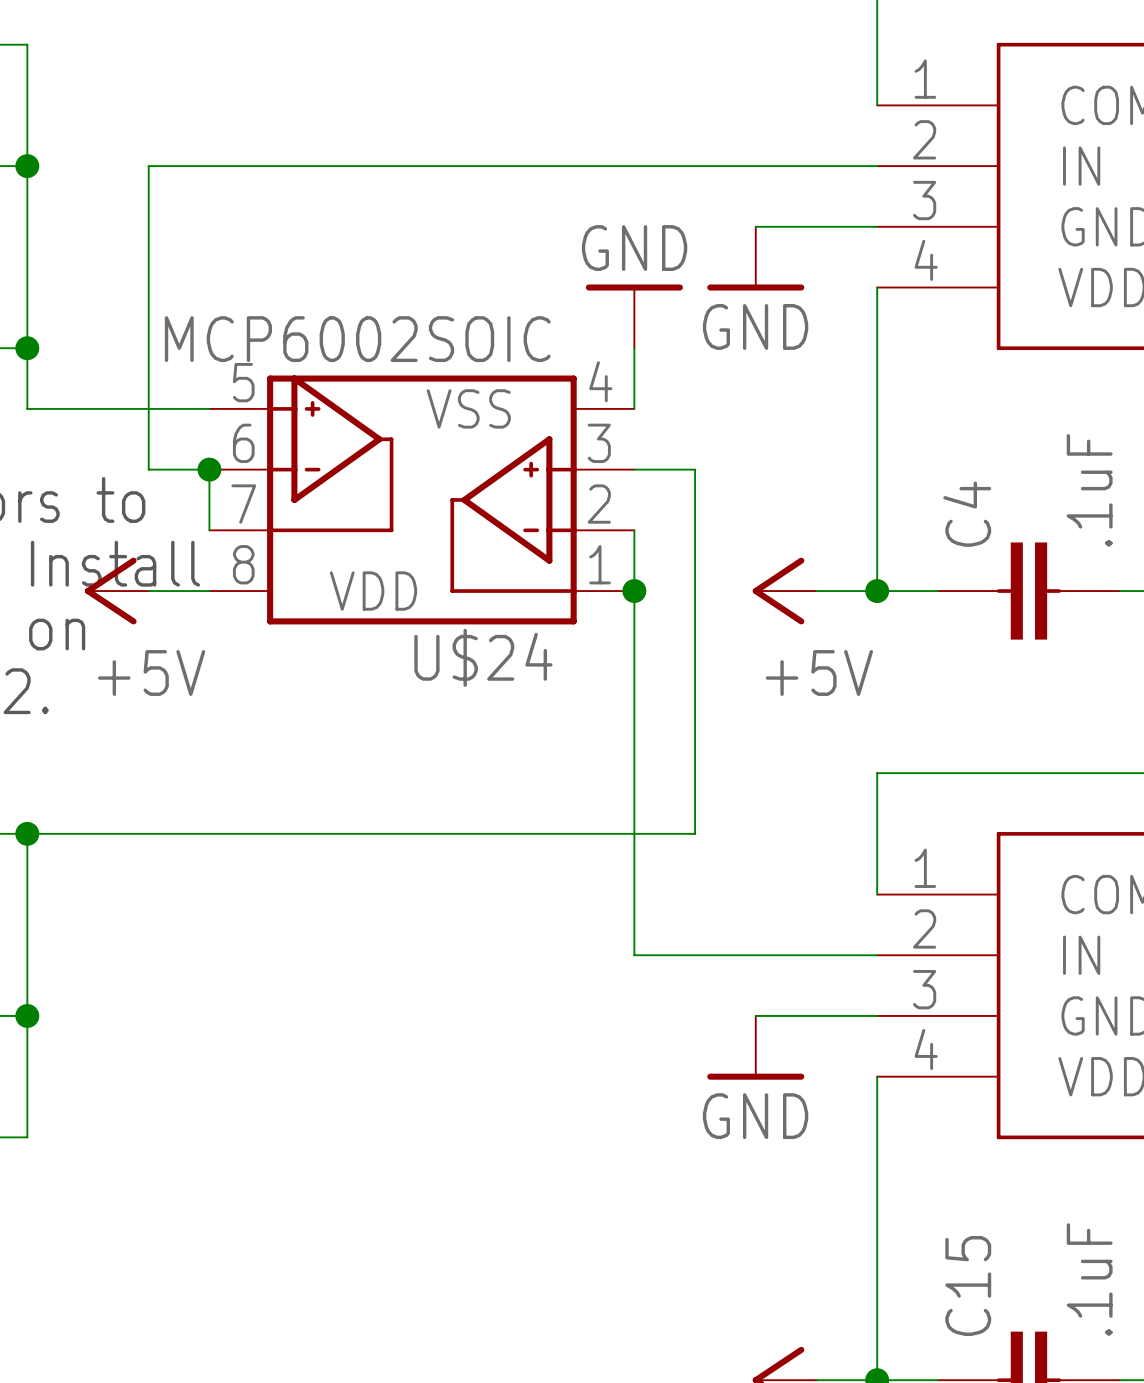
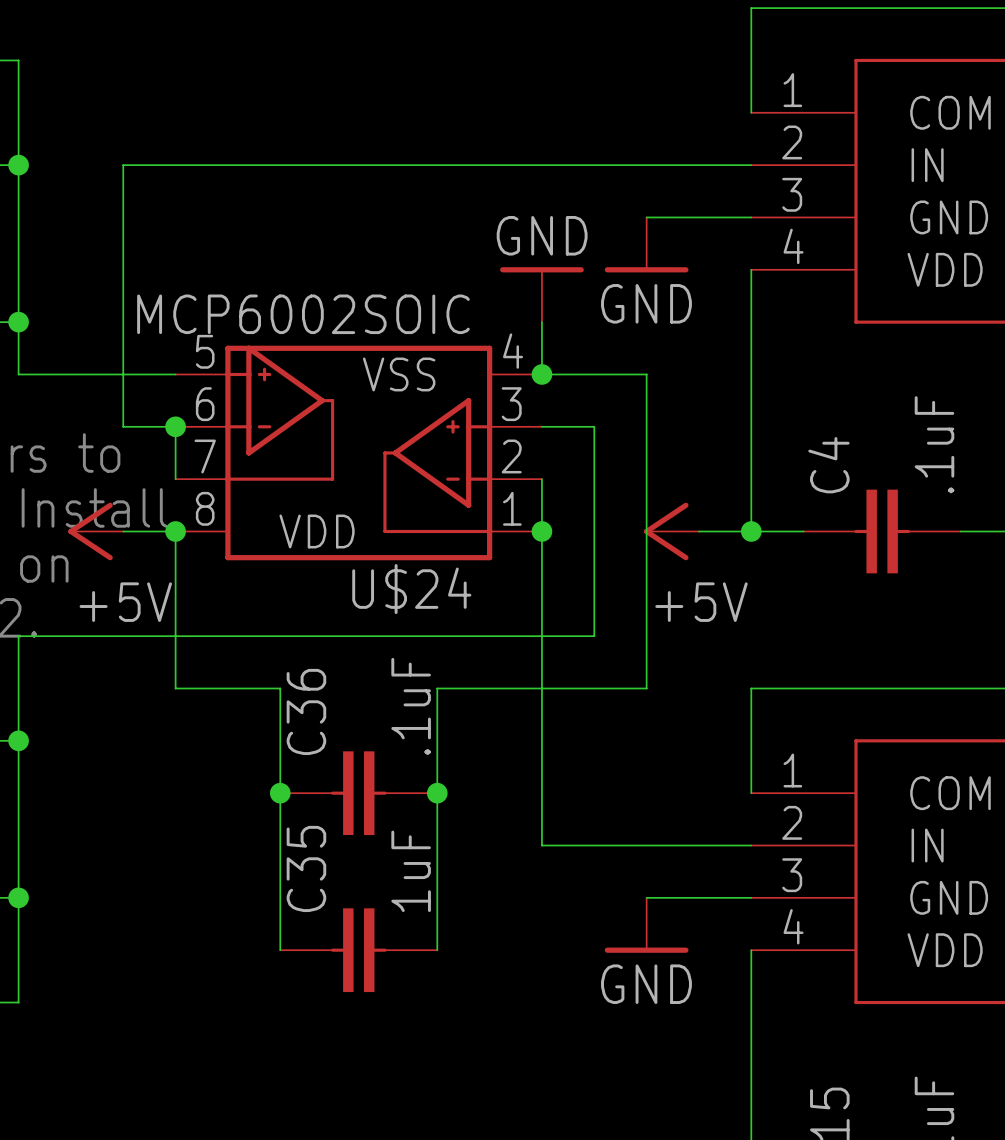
wire: none -> (541, 374) (646, 374) (646, 688) (437, 688) (437, 950)
junction: none -> (541, 374)
wire: none -> (175, 531) (175, 688) (280, 688) (280, 950)
junction: none -> (175, 531)
wire: (695, 712) (695, 833) (27, 833) -> (594, 636) (18, 636) (18, 740)
junction: none -> (280, 793)
C36: none -> .1uF (358, 793)
junction: none -> (437, 793)
C35: none -> 1uF (358, 950)

